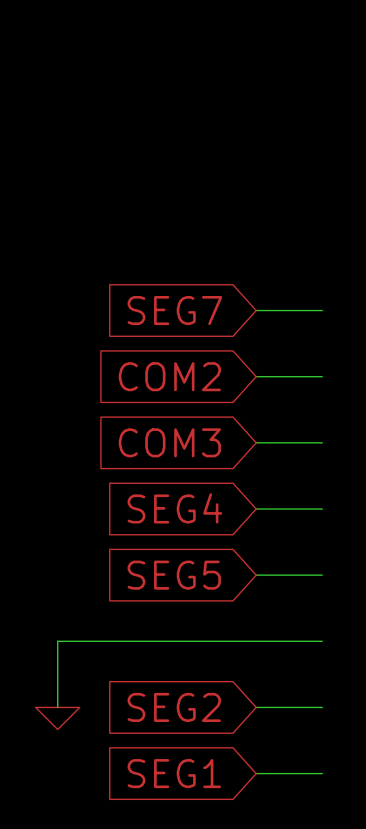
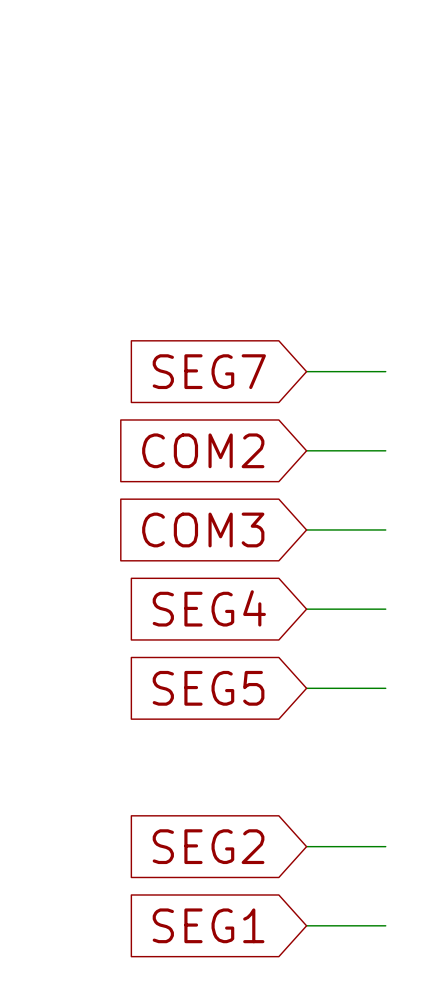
wire: (322, 641) (57, 641) (57, 707) -> none
power symbol: (57, 718) -> none

